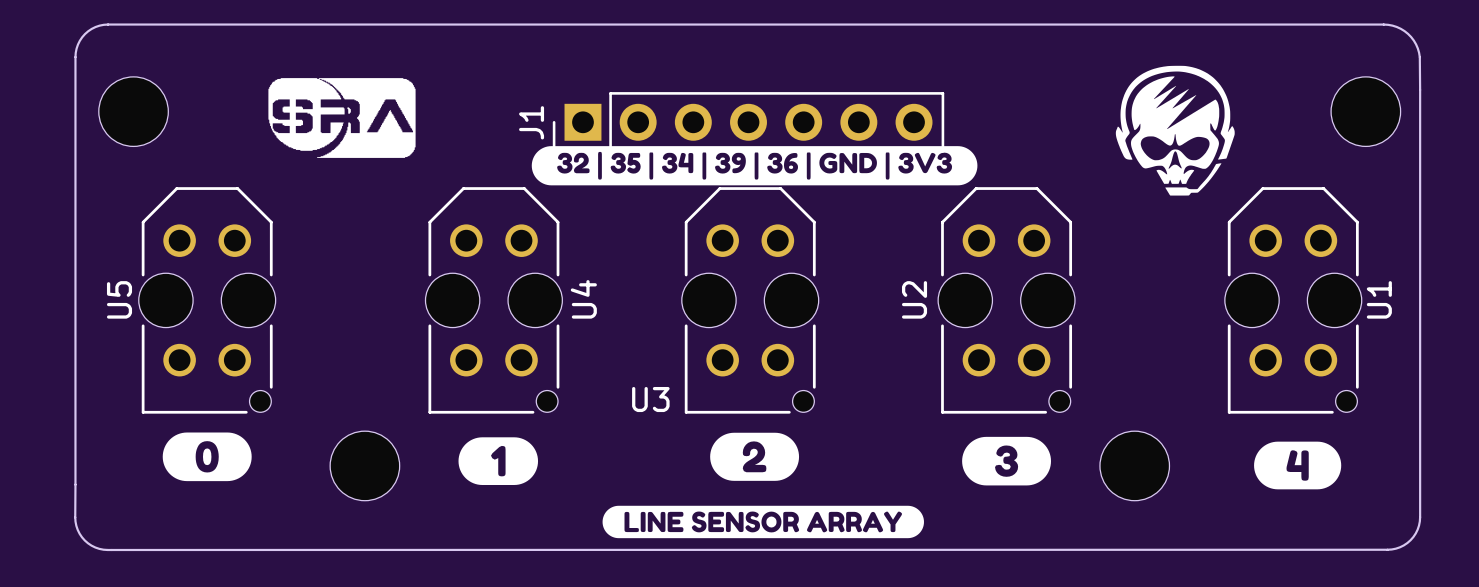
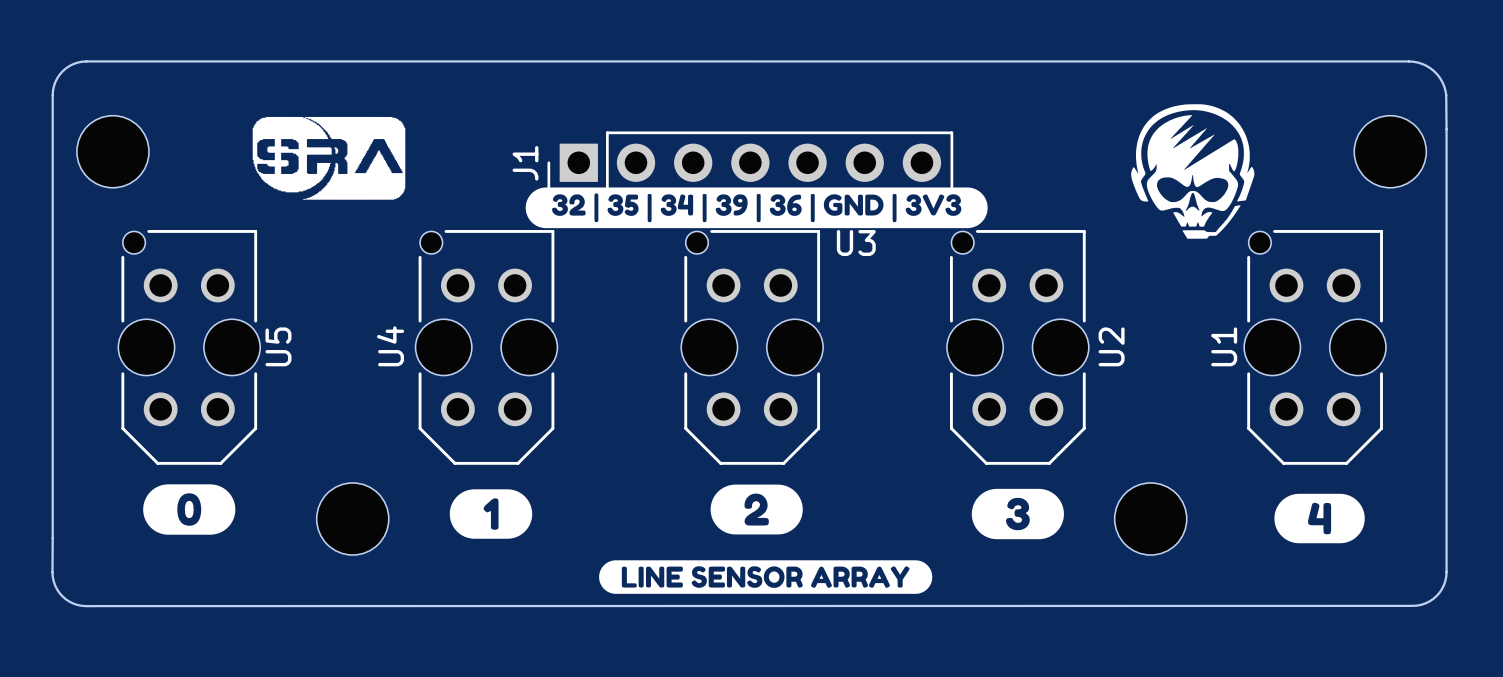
U5 rotation: 0° (207, 300) -> 180° (189, 347)
U4 rotation: 0° (493, 300) -> 180° (486, 347)
U3 rotation: 0° (750, 300) -> 180° (752, 347)
U2 rotation: 0° (1006, 300) -> 180° (1017, 347)
U1 rotation: 0° (1293, 300) -> 180° (1315, 347)

